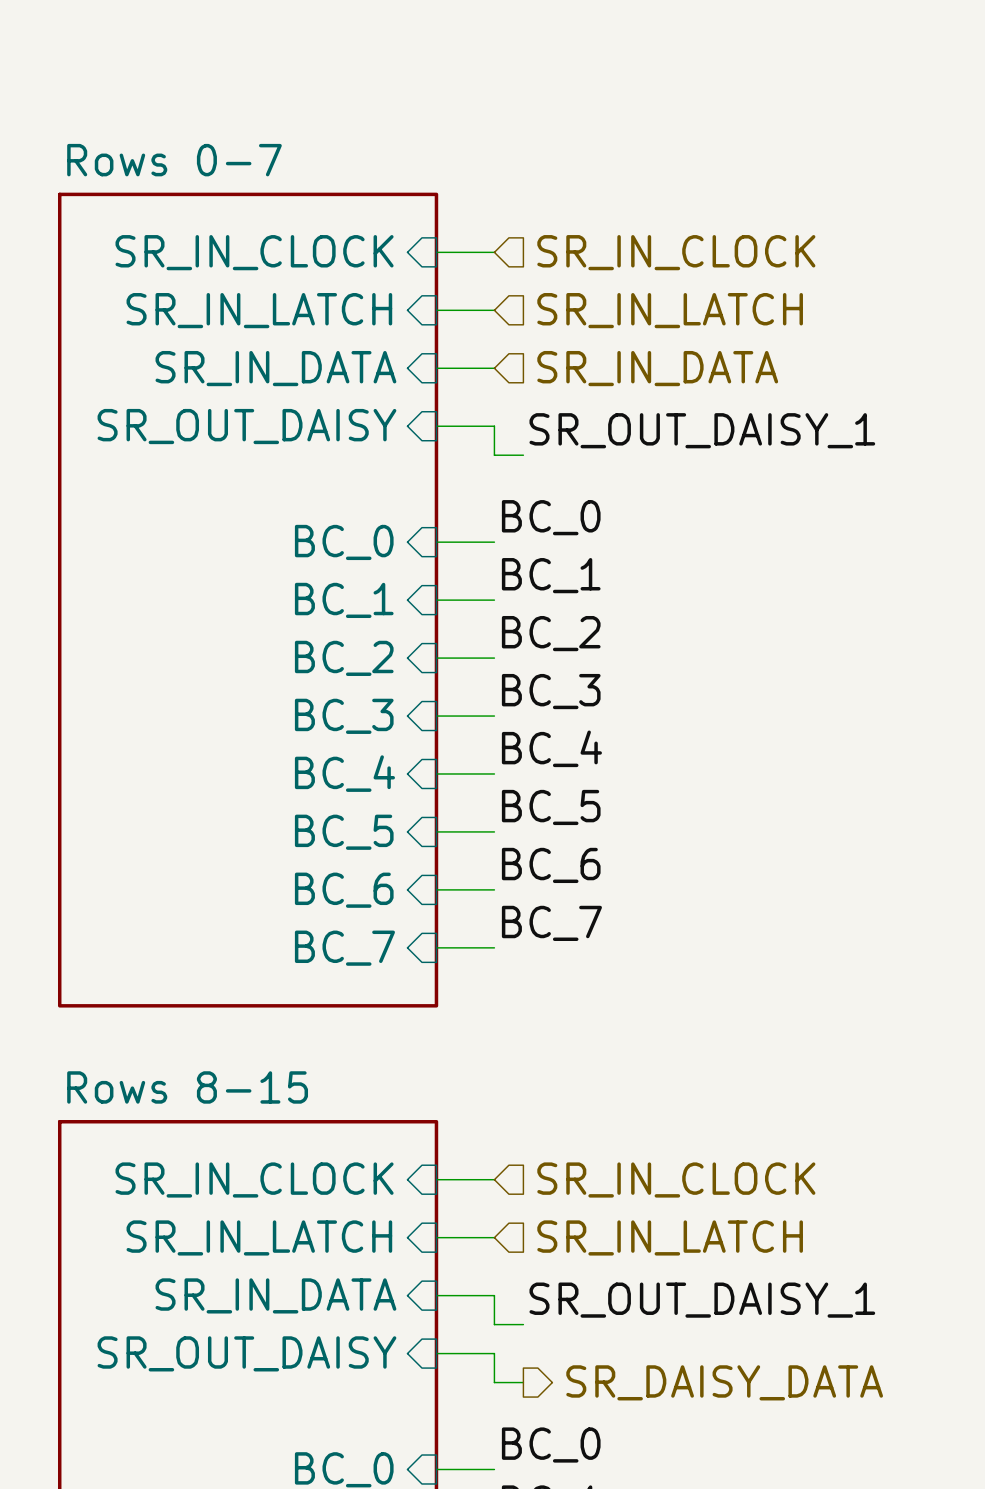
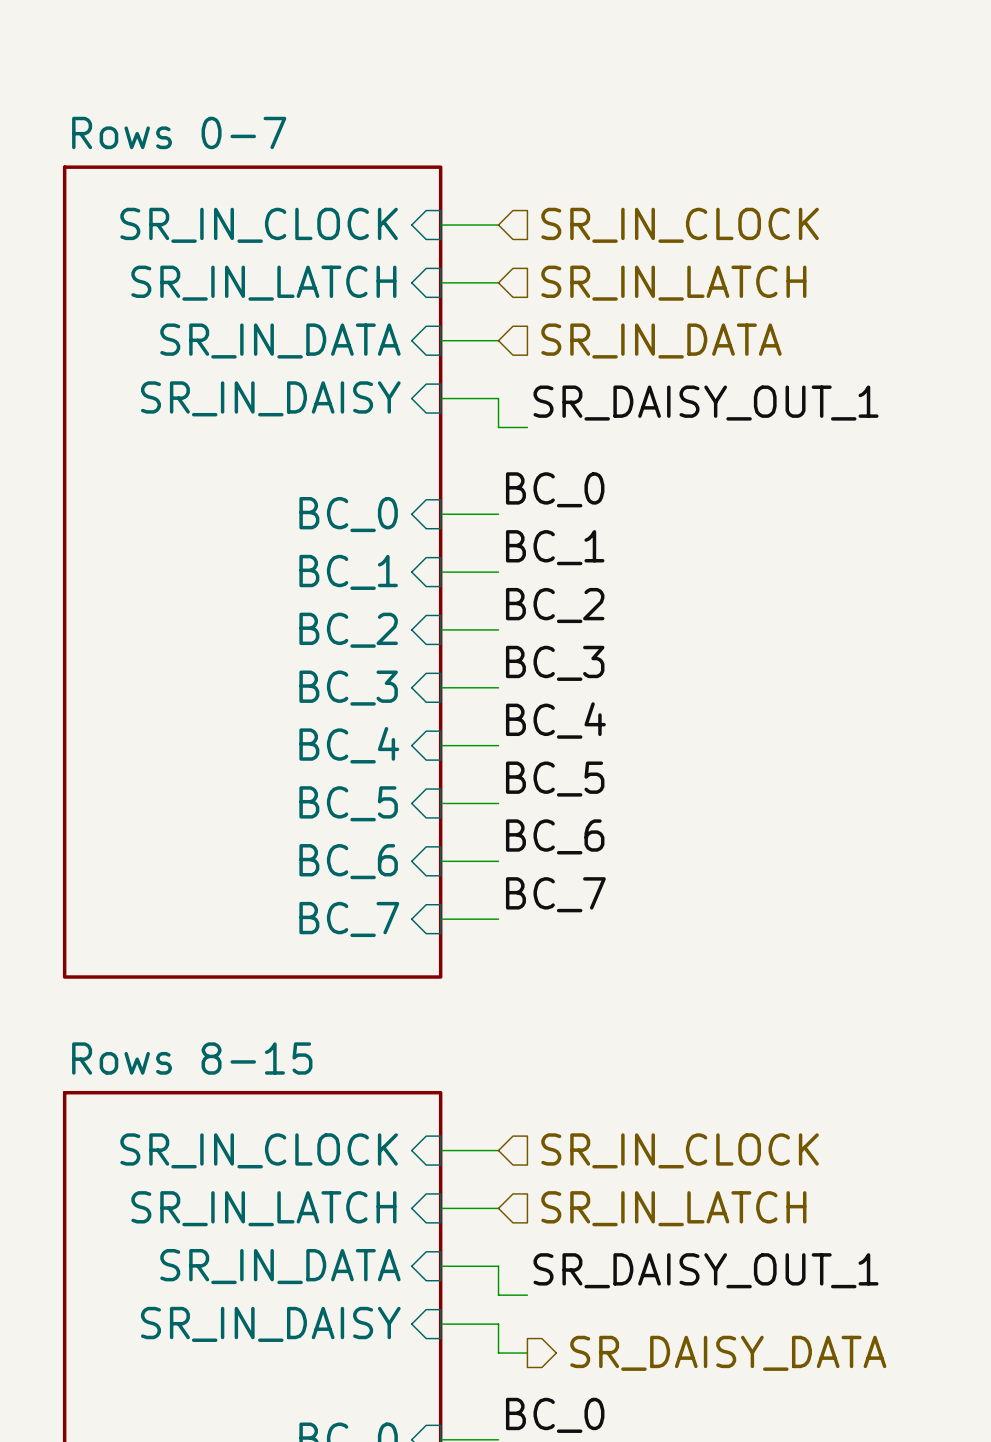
sheet pin: SR_OUT_DAISY (246, 426) -> SR_IN_DAISY (270, 398)
label: SR_OUT_DAISY_1 (702, 430) -> SR_DAISY_OUT_1 (706, 403)
label: SR_OUT_DAISY_1 (702, 1300) -> SR_DAISY_OUT_1 (706, 1270)
sheet pin: SR_OUT_DAISY (246, 1353) -> SR_IN_DAISY (270, 1324)

